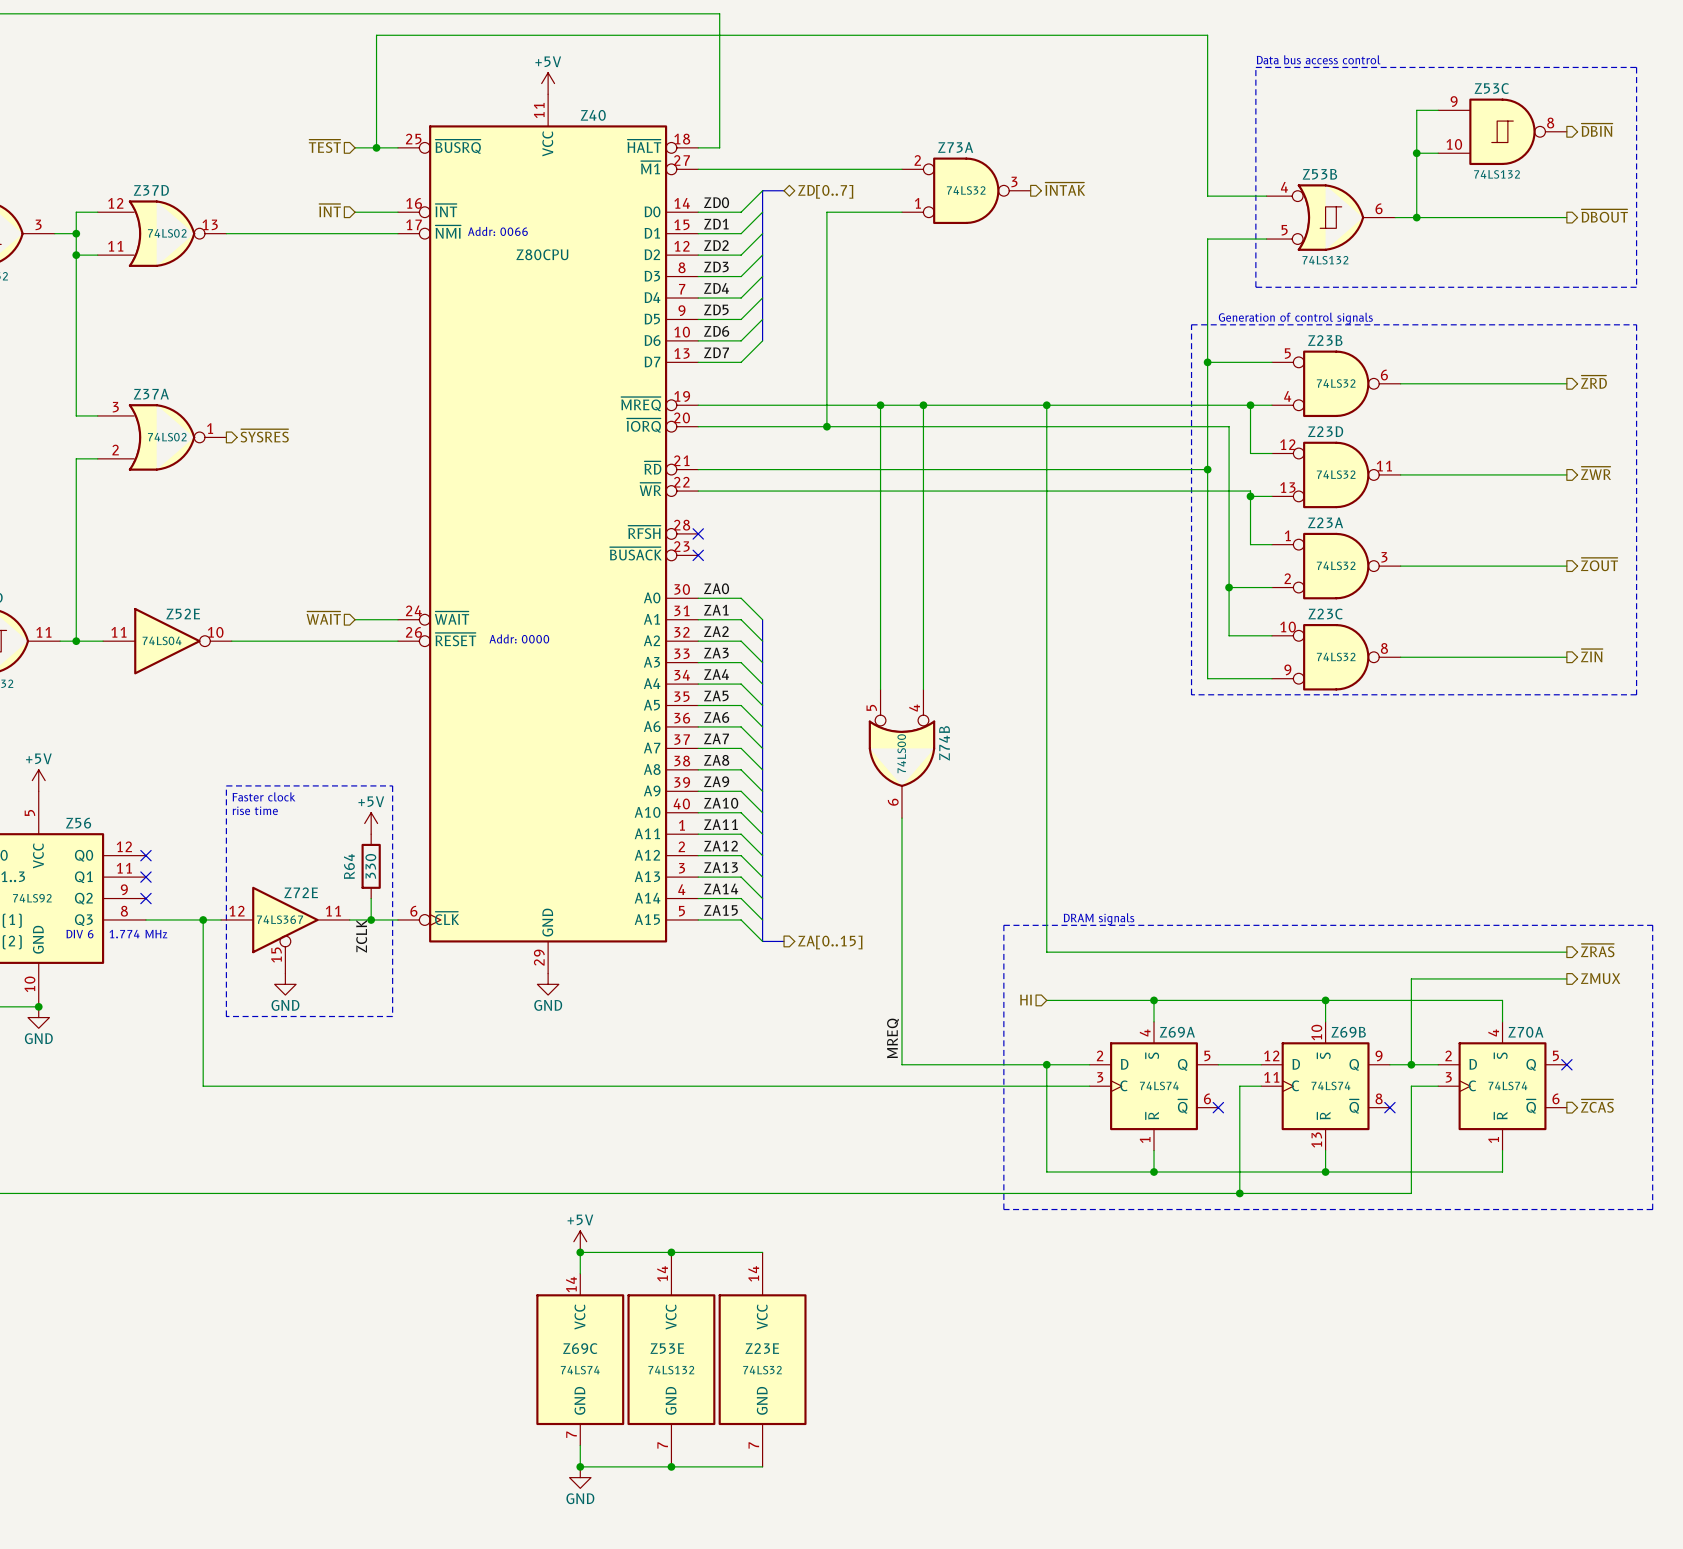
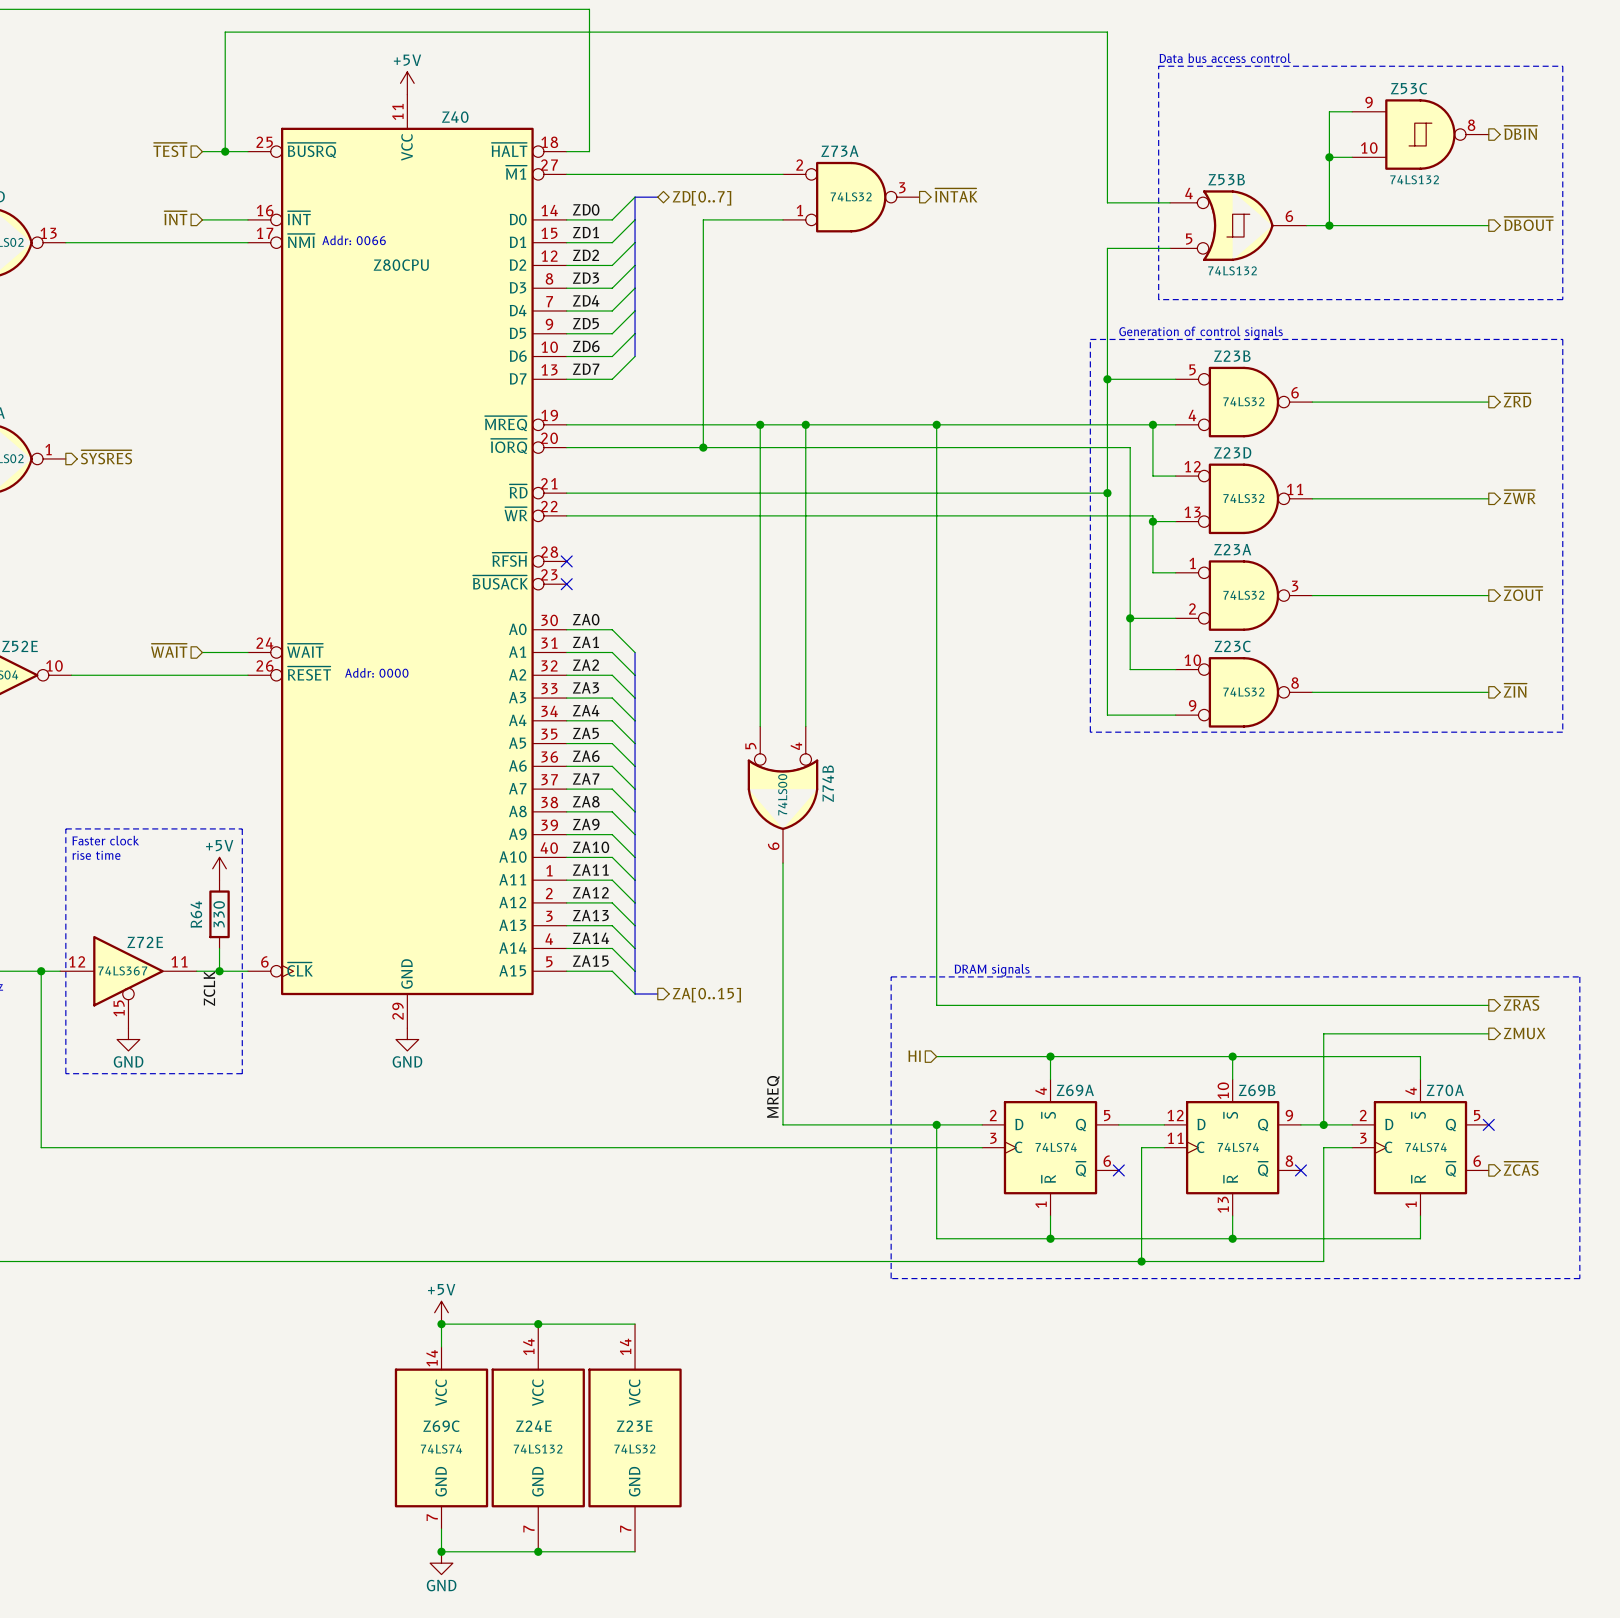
Z53E name: Z53E (667, 1348) -> Z24E (533, 1426)

